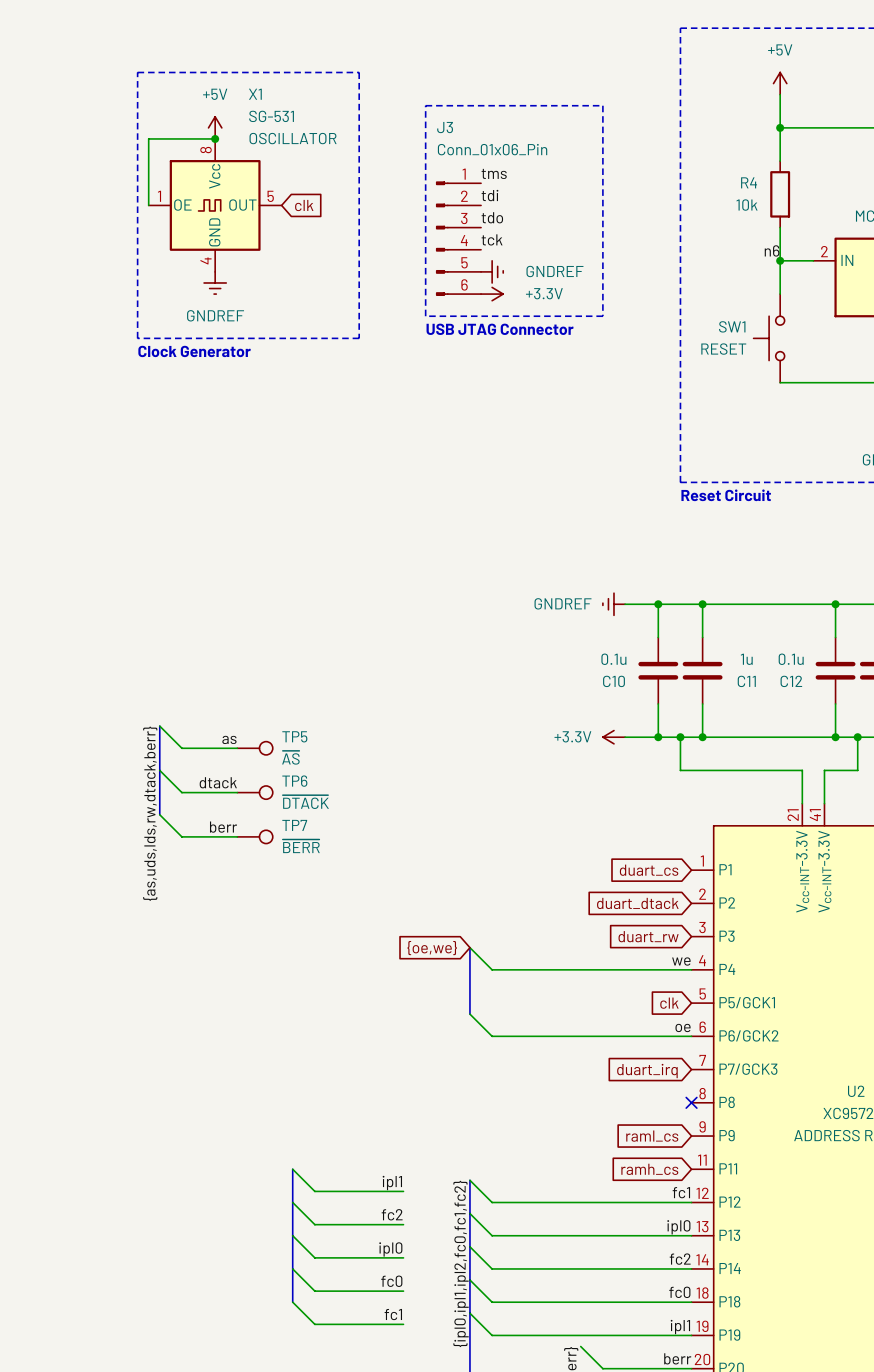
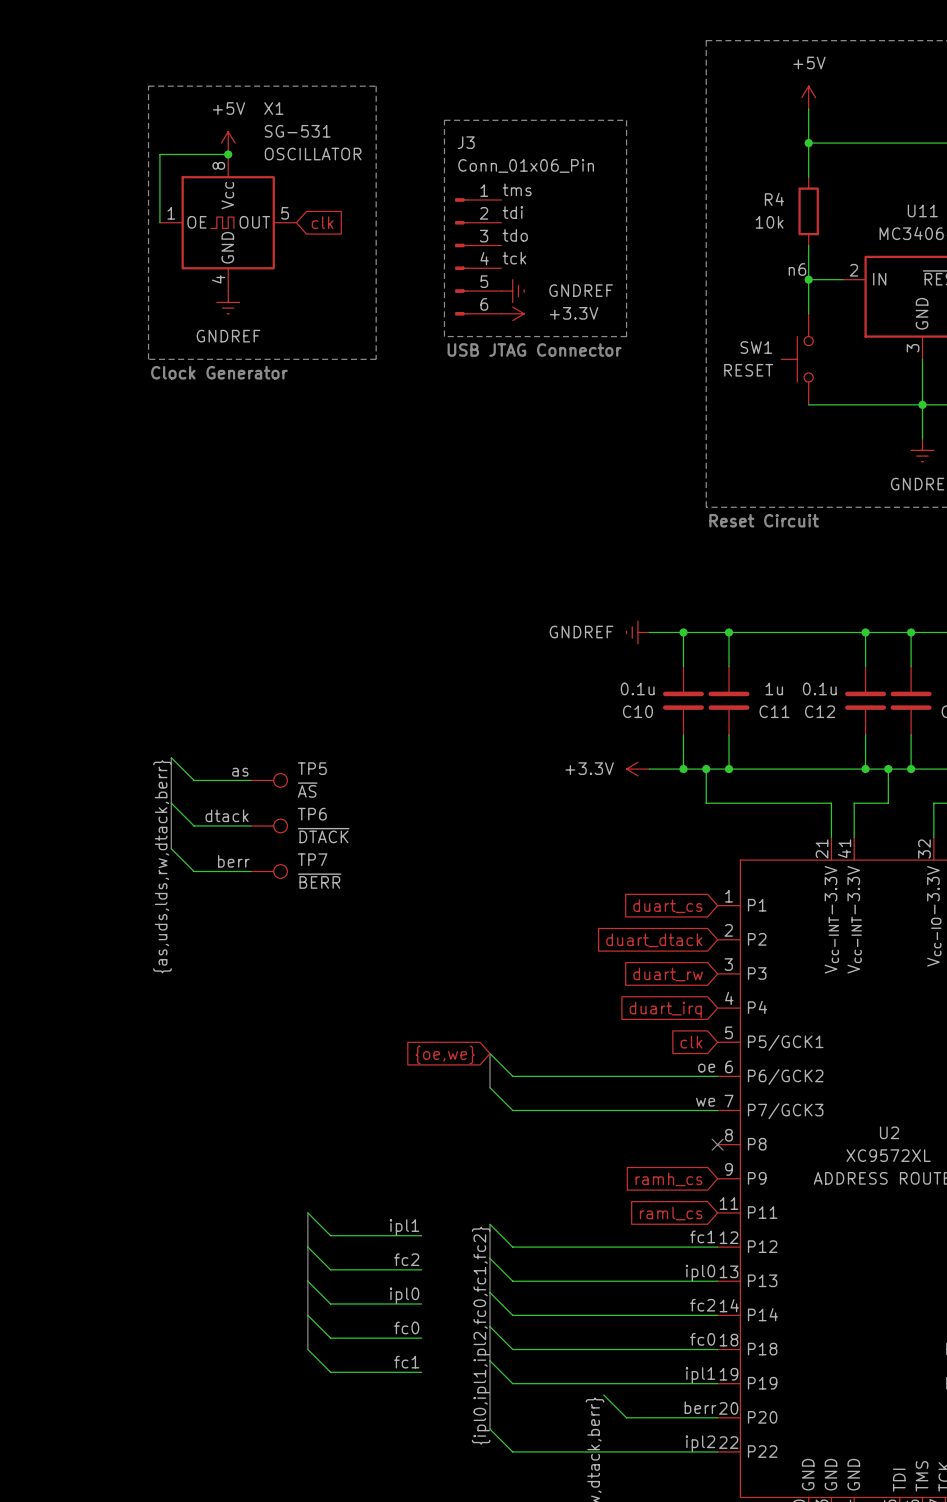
wire: (469, 947) (492, 969) (691, 969) -> (489, 1087) (512, 1110) (717, 1110)
bus: (469, 947) (469, 1014) -> (489, 1087) (489, 1053)
global label position: {oe,we} (432, 948) -> {oe,we} (445, 1054)
label position: we (681, 961) -> we (705, 1102)
global label position: duart_irq (647, 1071) -> duart_irq (665, 1009)
global label: raml_cs (652, 1136) -> ramh_cs (668, 1179)
global label: ramh_cs (649, 1169) -> raml_cs (671, 1213)

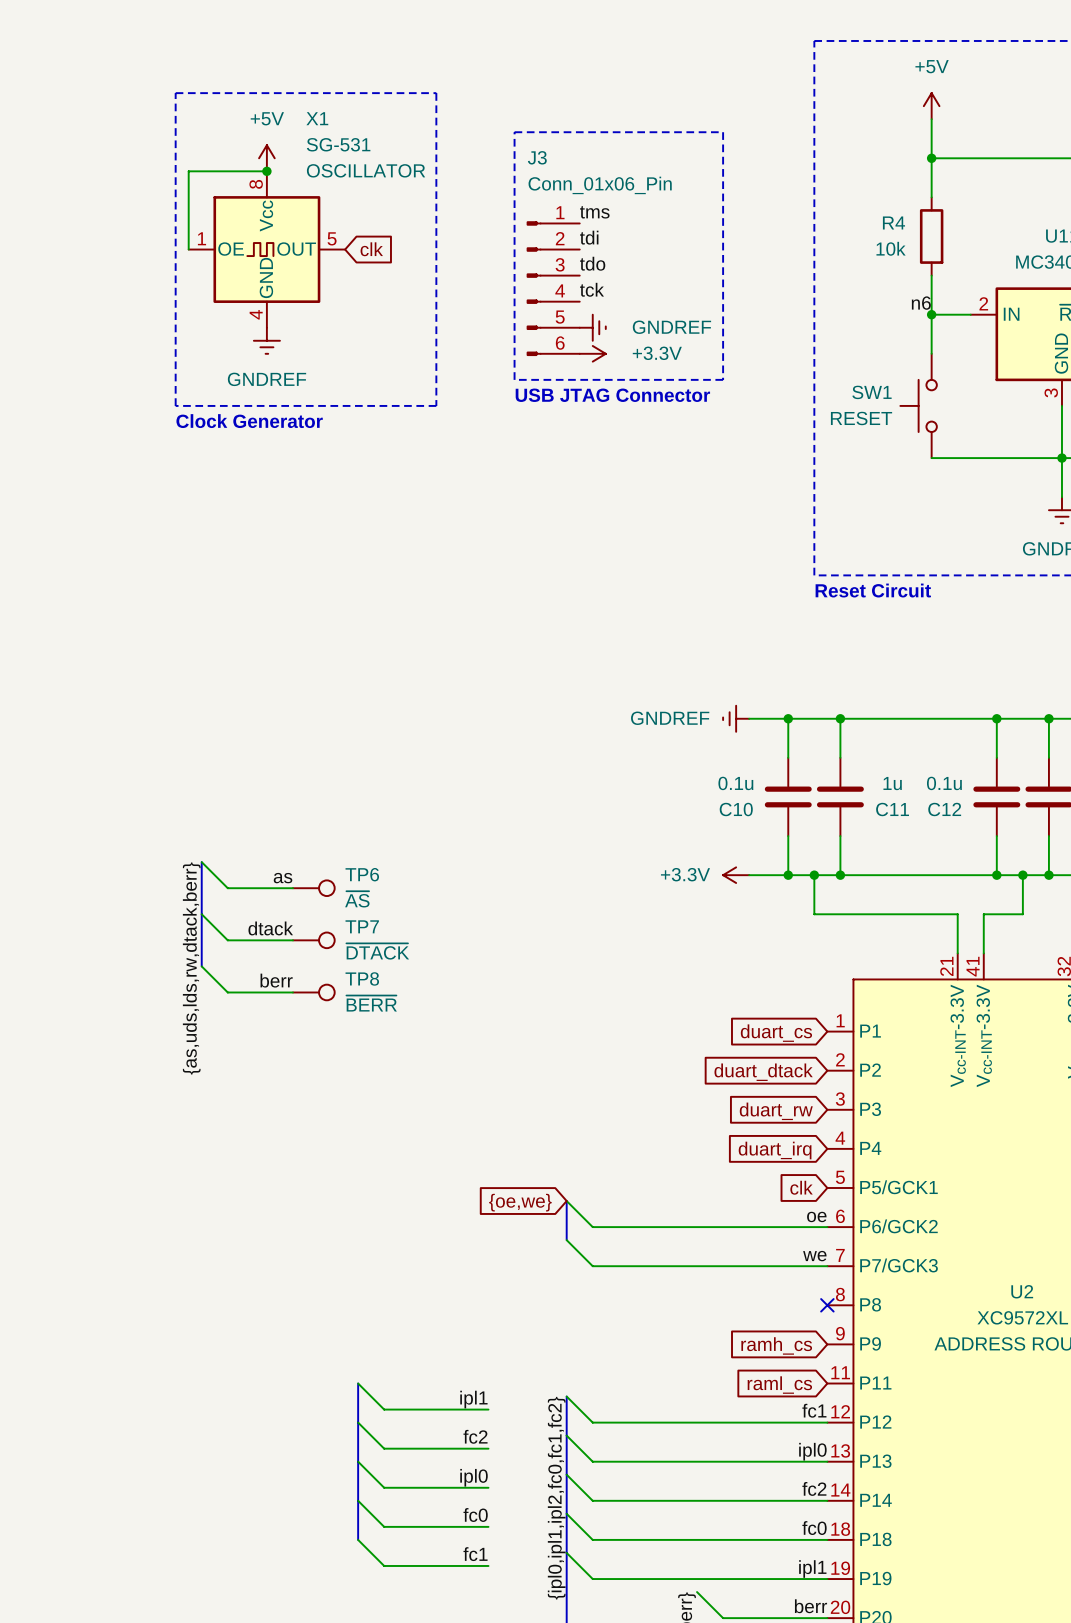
TP5 name: TP5 (312, 768) -> TP6 (362, 874)
TP6 name: TP6 (312, 814) -> TP7 (362, 926)
TP7 name: TP7 (312, 859) -> TP8 (362, 978)

